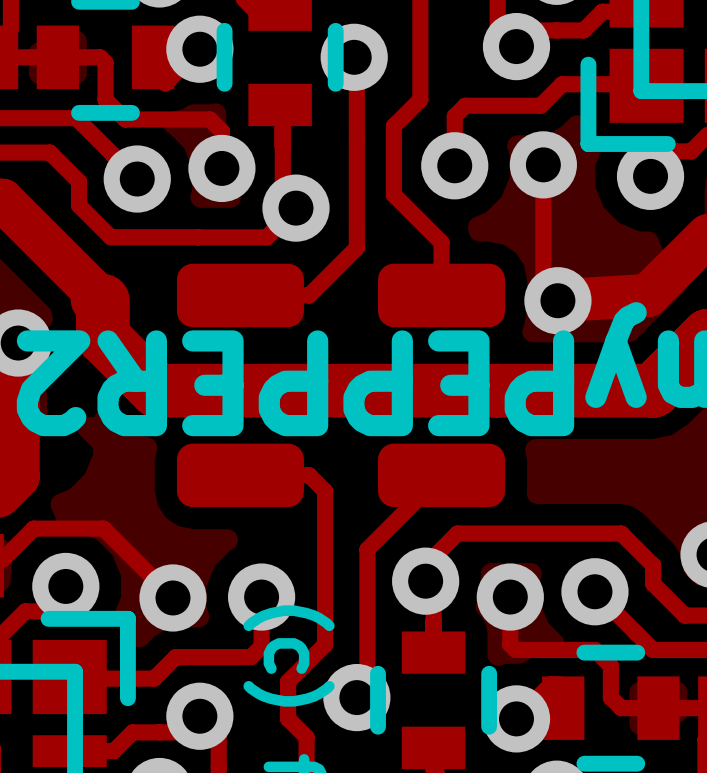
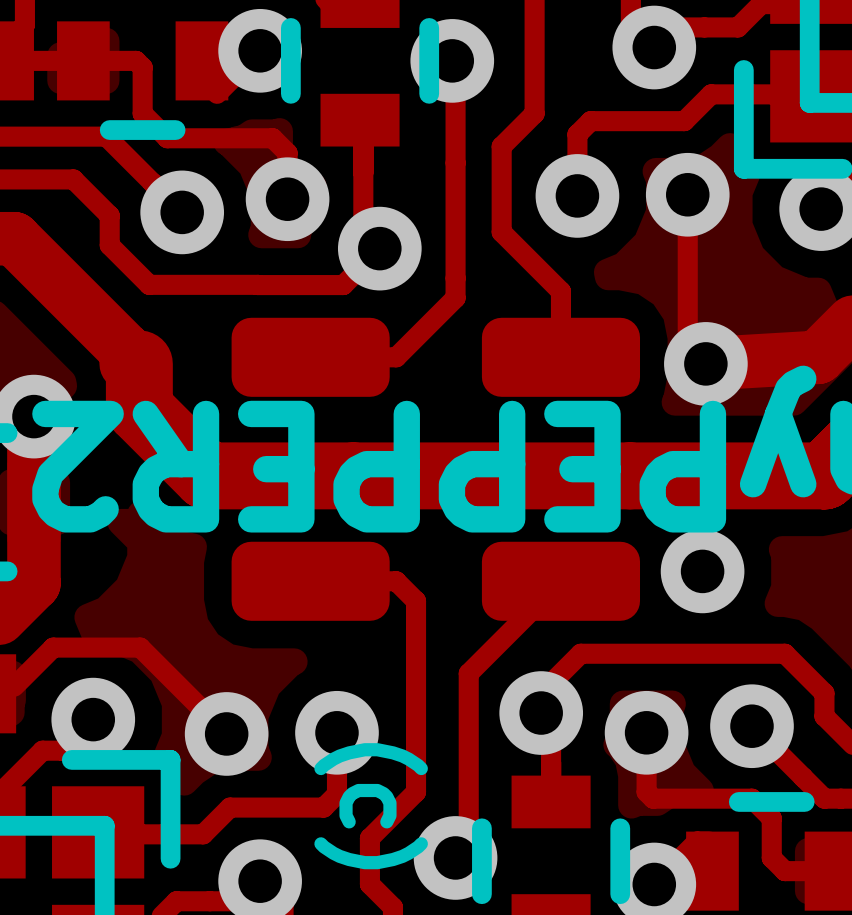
via: none -> (702, 571)

